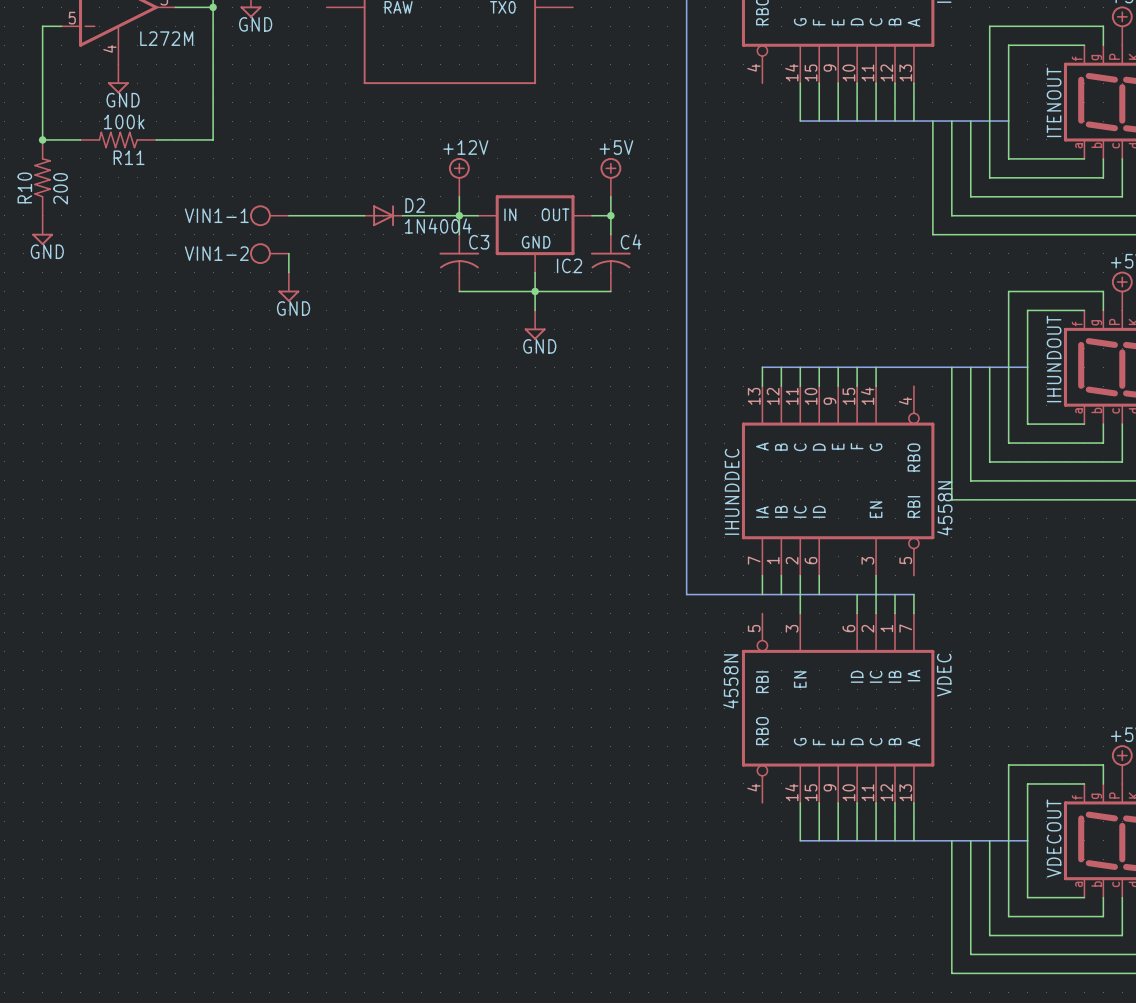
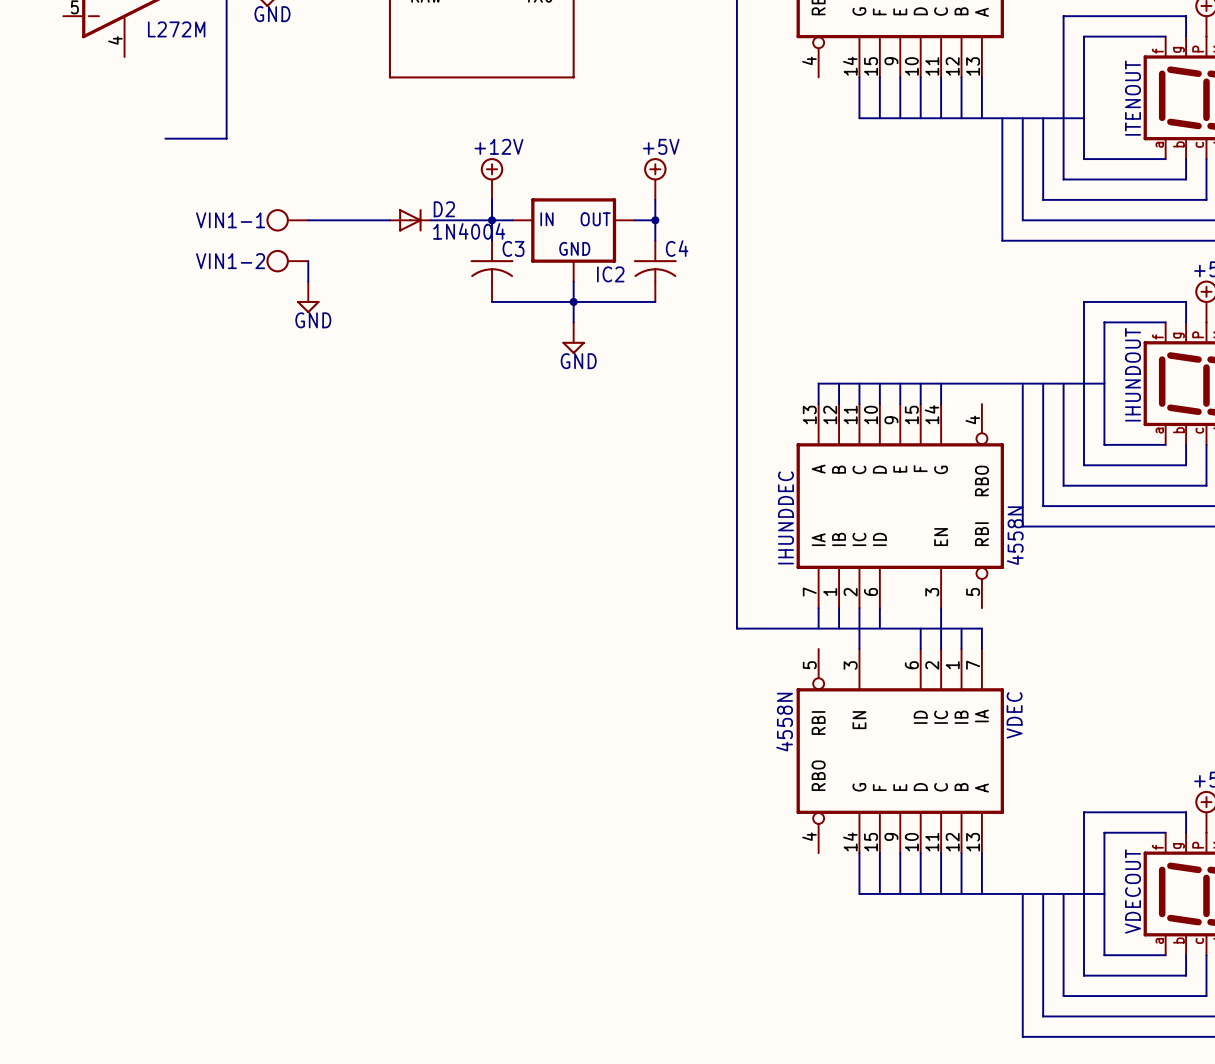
wire: (61, 26) (42, 26) (42, 139) (80, 139) -> none
power symbol: GND (118, 78) -> none
junction: (42, 139) -> none
R11: 100k (118, 139) -> none
R10: 200 (42, 177) -> none
power symbol: GND (42, 230) -> none

